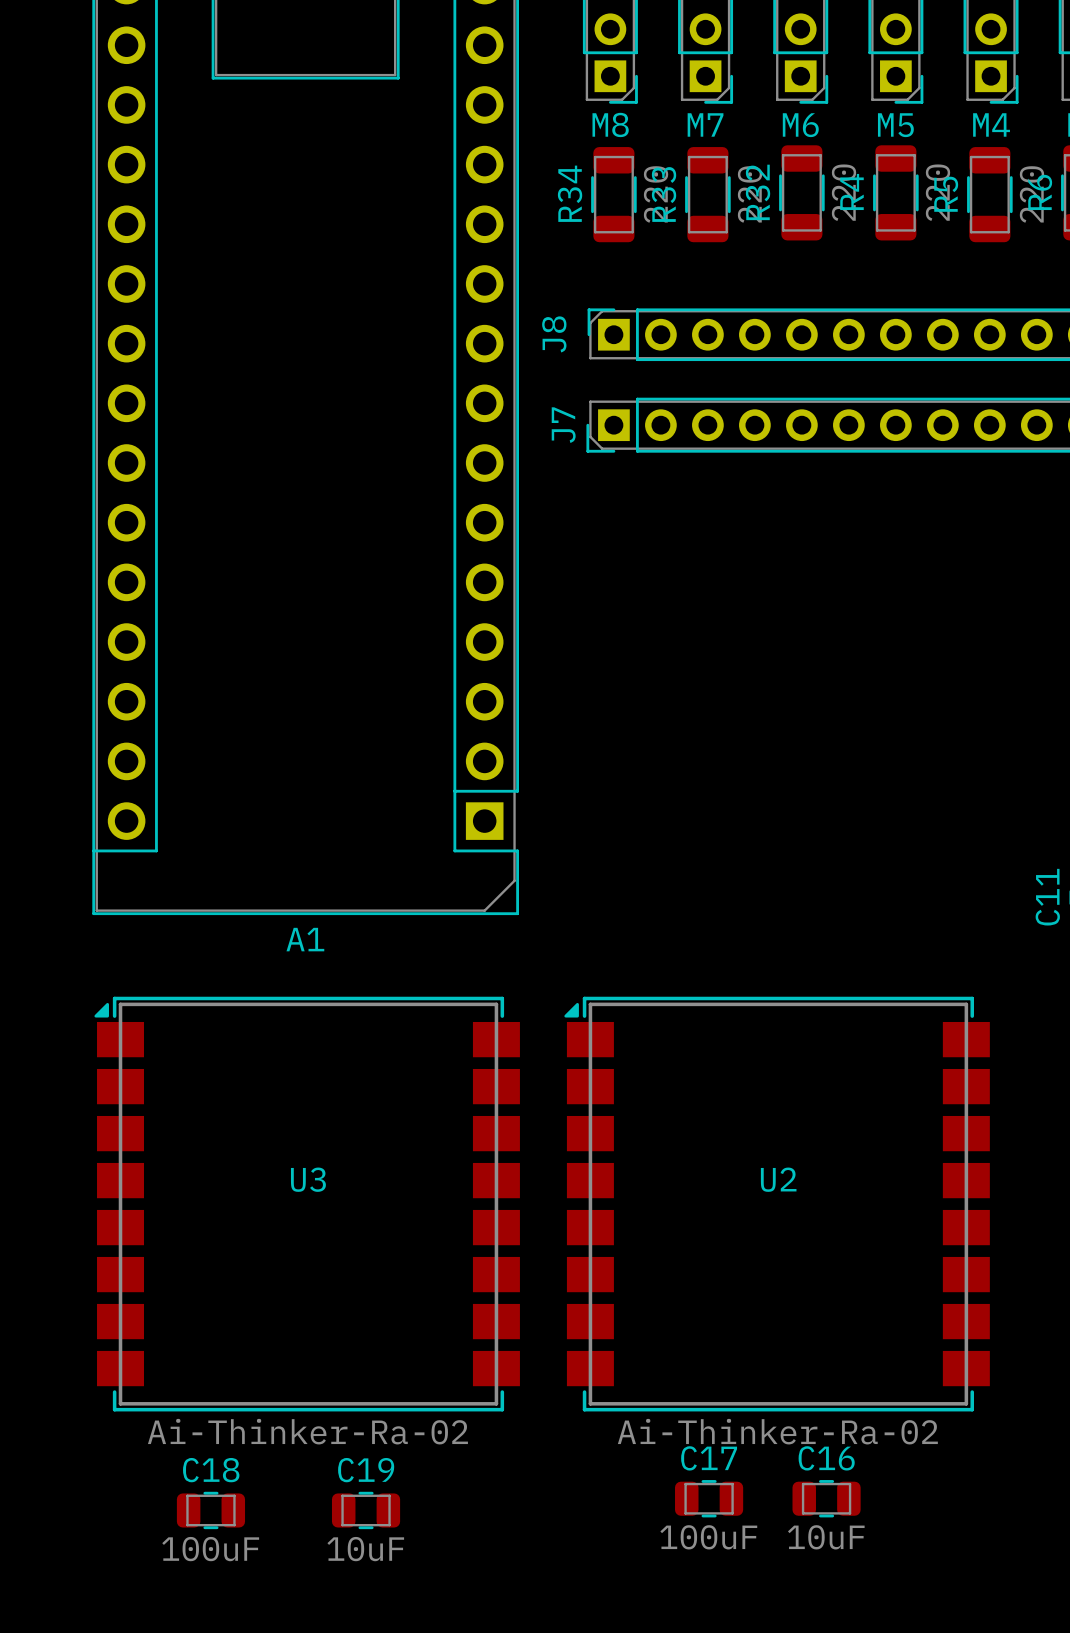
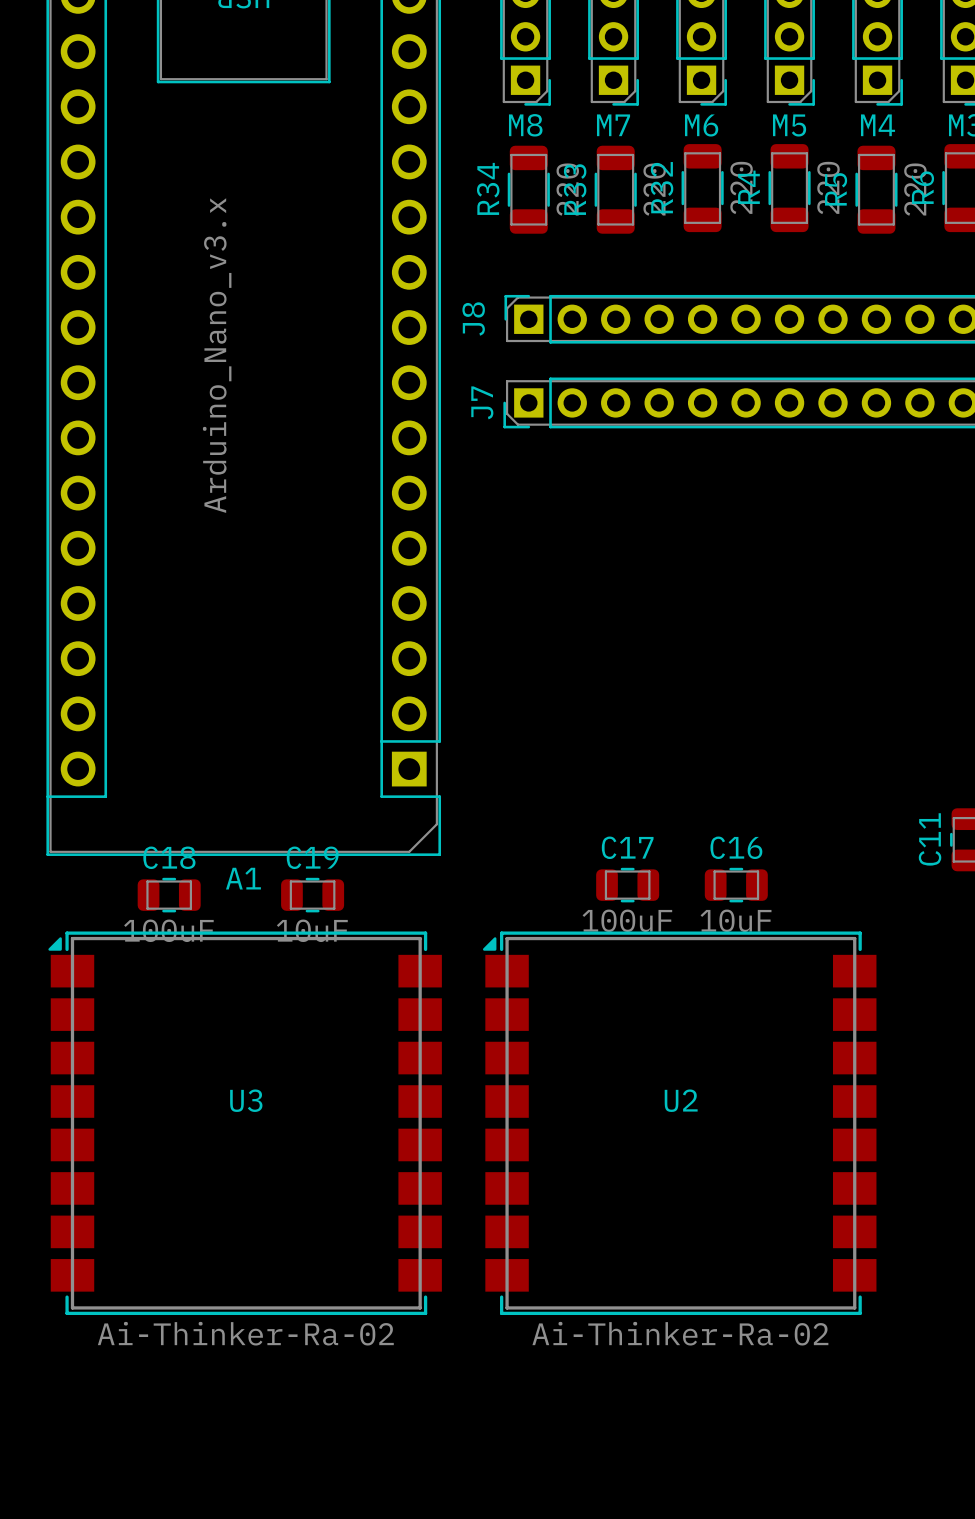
A1 value: none -> Arduino_Nano_v3.x (217, 355)
C17 position: (709, 1498) -> (627, 885)
C16 position: (826, 1498) -> (736, 885)
C18 position: (210, 1510) -> (169, 895)
C19 position: (366, 1510) -> (312, 895)

